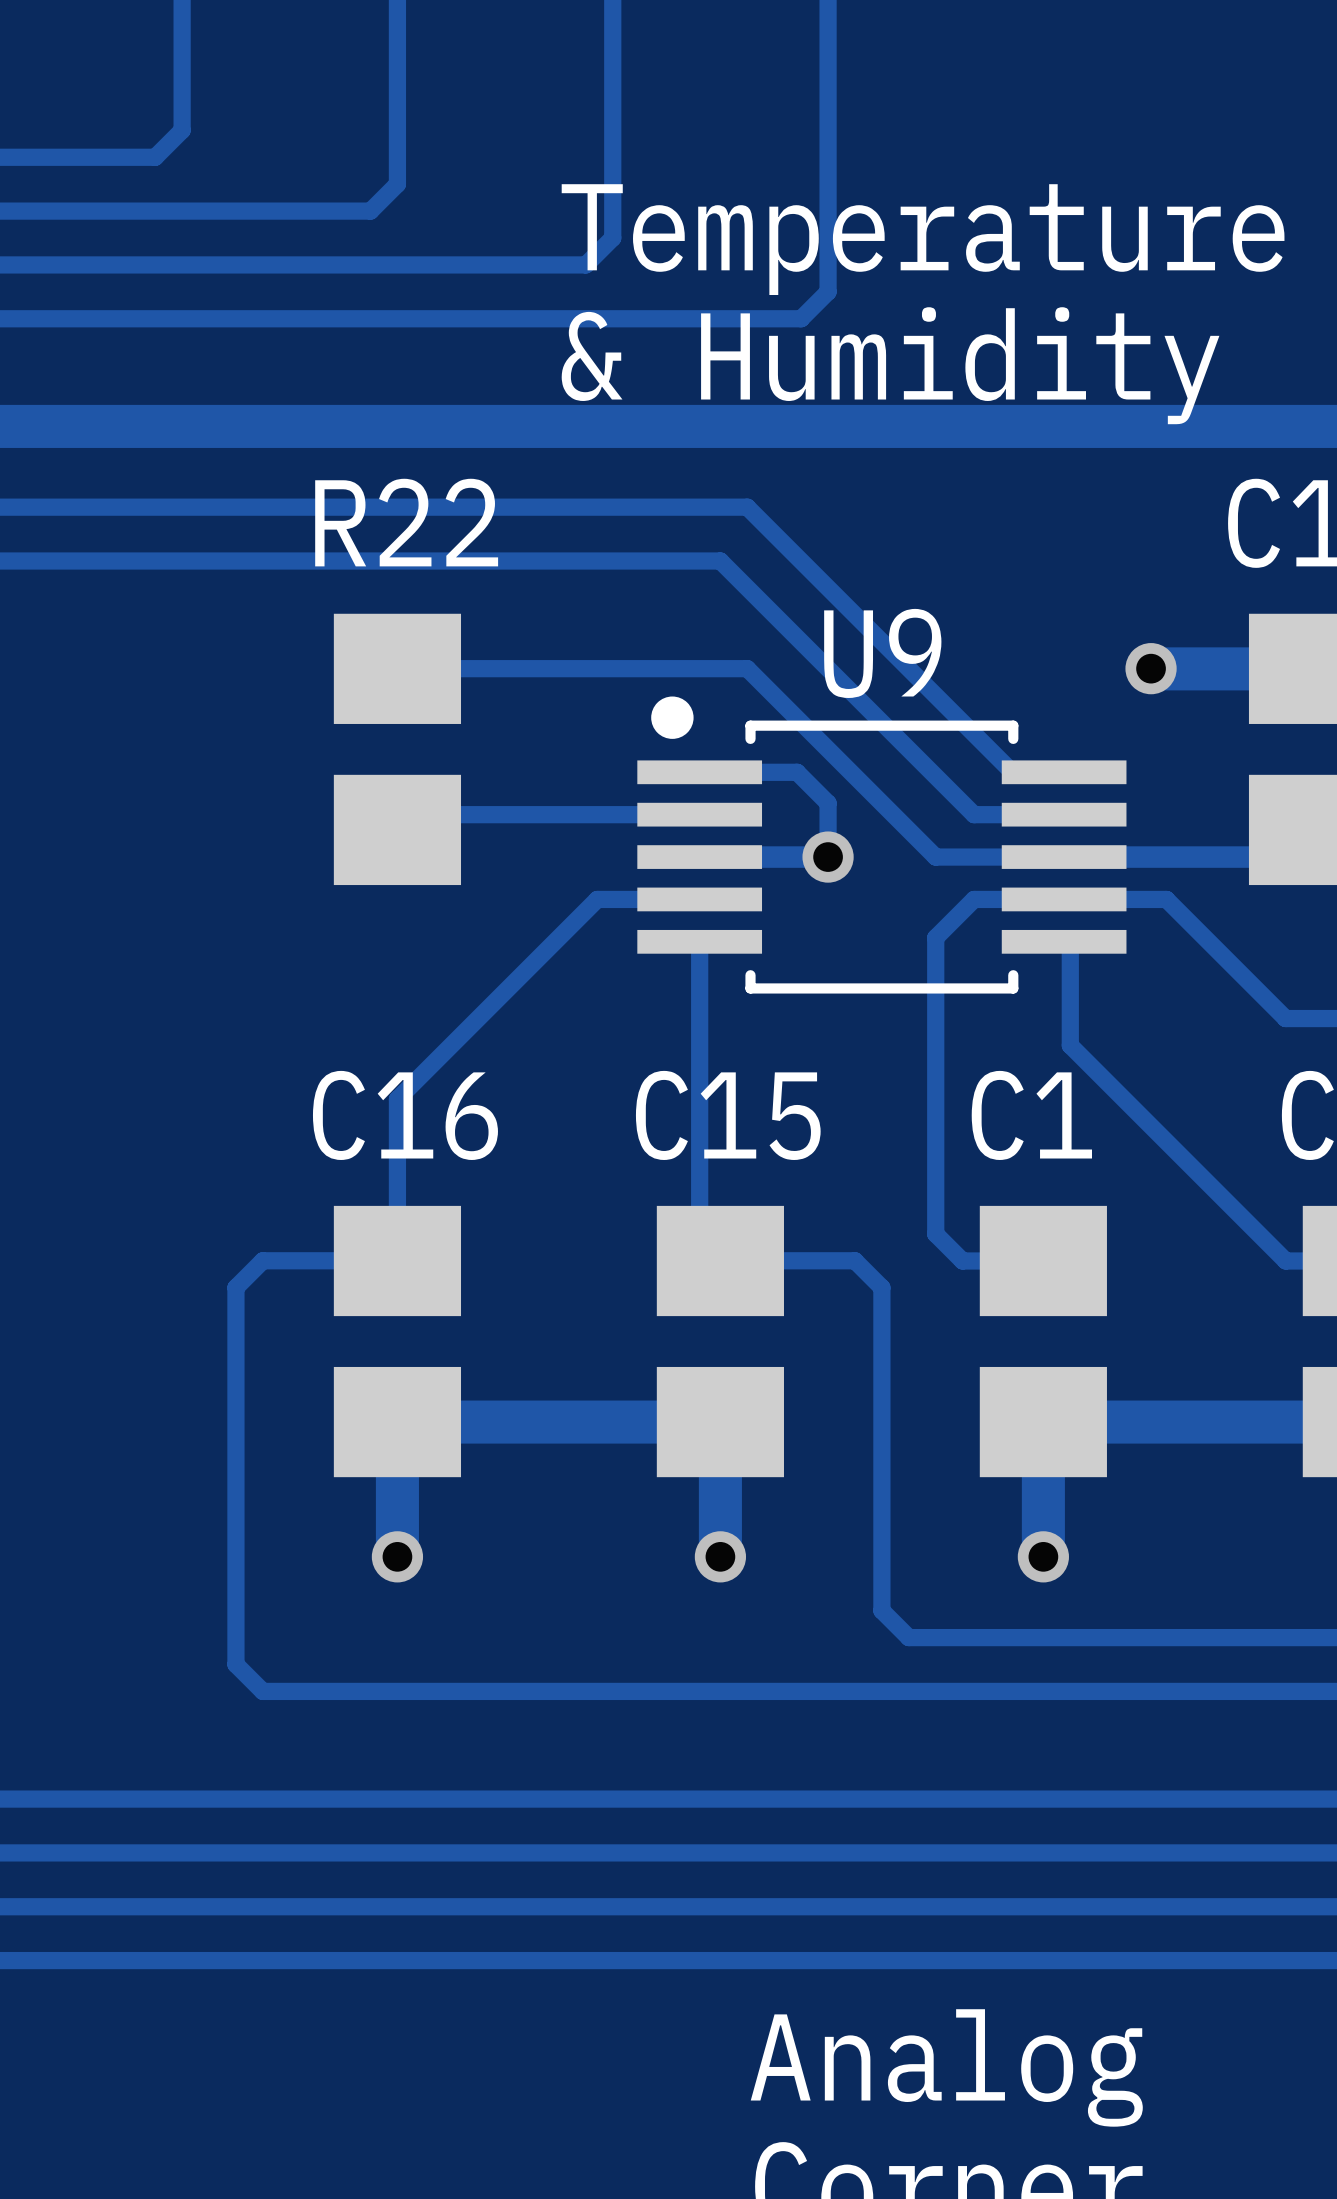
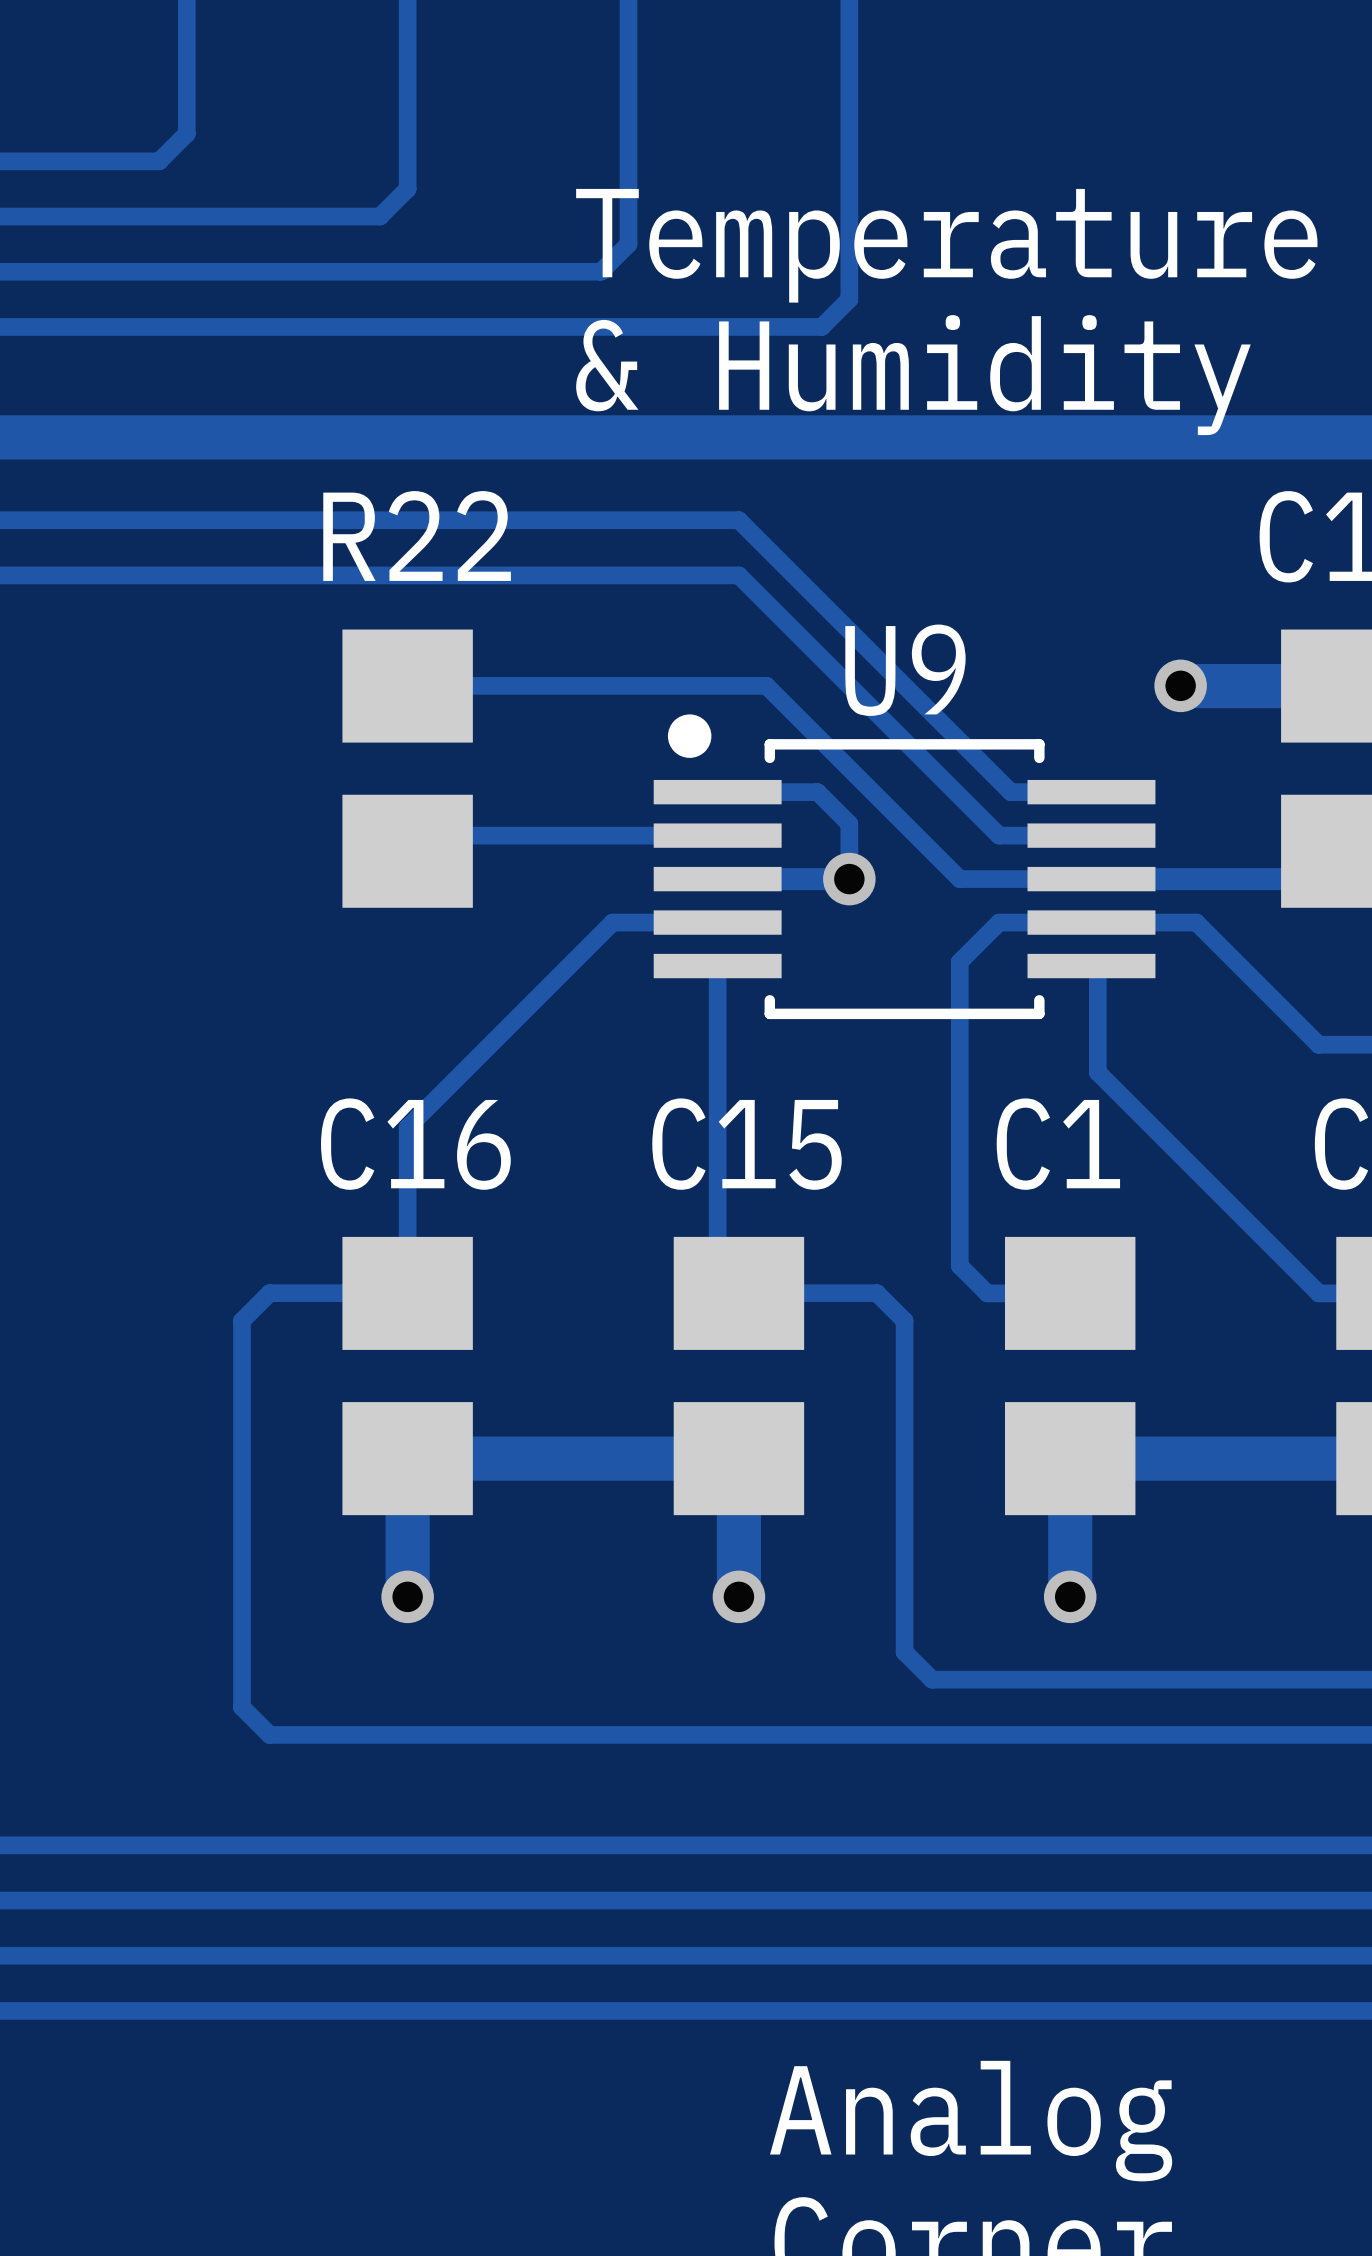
track: (720, 507) (747, 507) (1012, 772) -> (738, 520) (1010, 792) (1038, 792)

